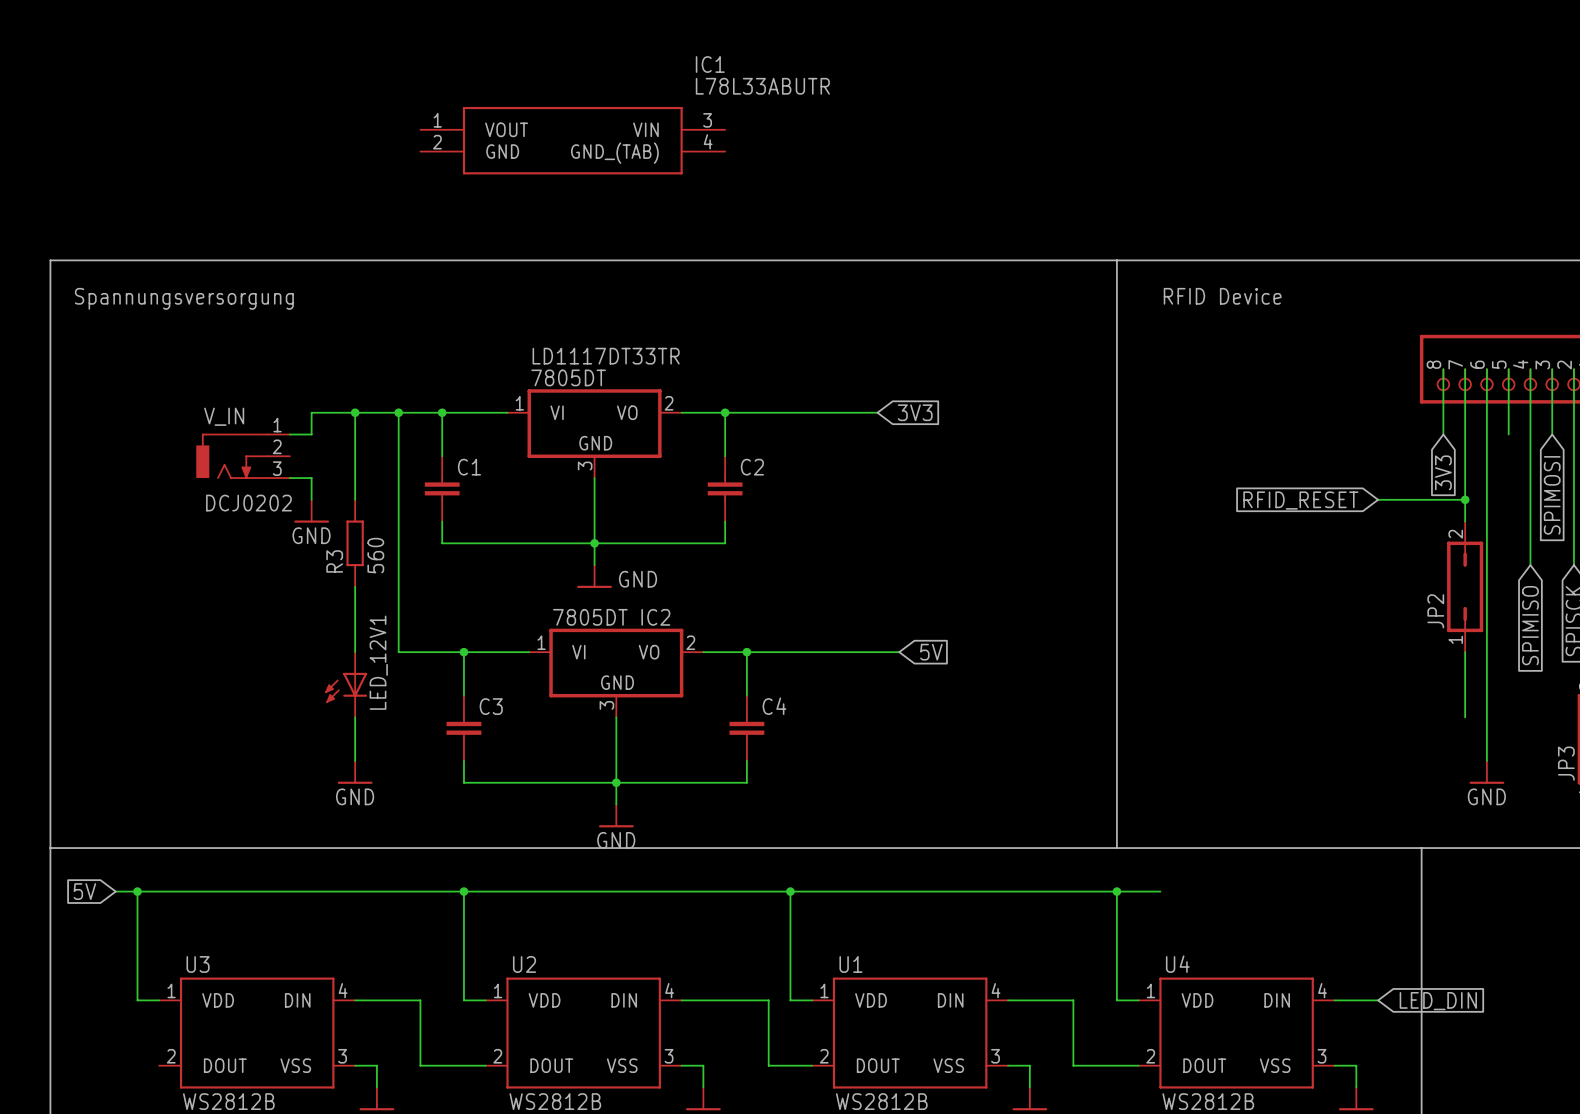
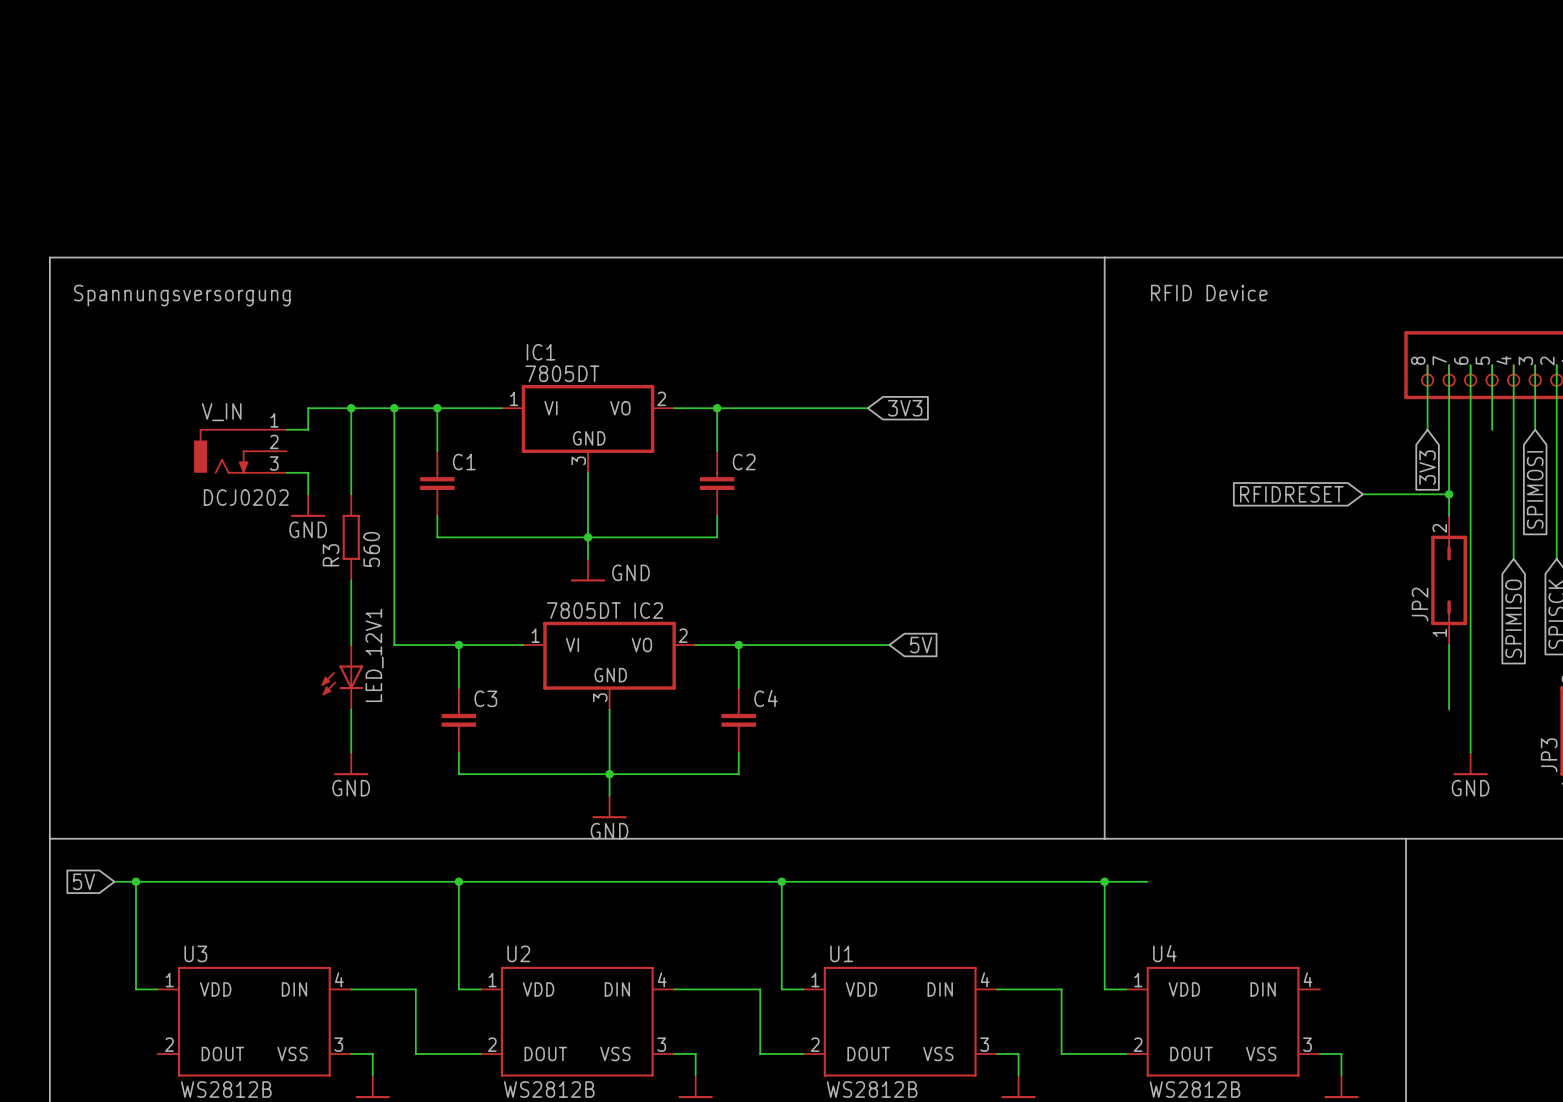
IC1: L78L33ABUTR (572, 140) -> none
LD1117DT33TR name: LD1117DT33TR (606, 356) -> IC1 (541, 352)
global label: RFID_RESET (1300, 500) -> RFIDRESET (1291, 494)
wire: (1334, 1000) (1378, 1000) -> none
global label: LED_DIN (1438, 1001) -> none

